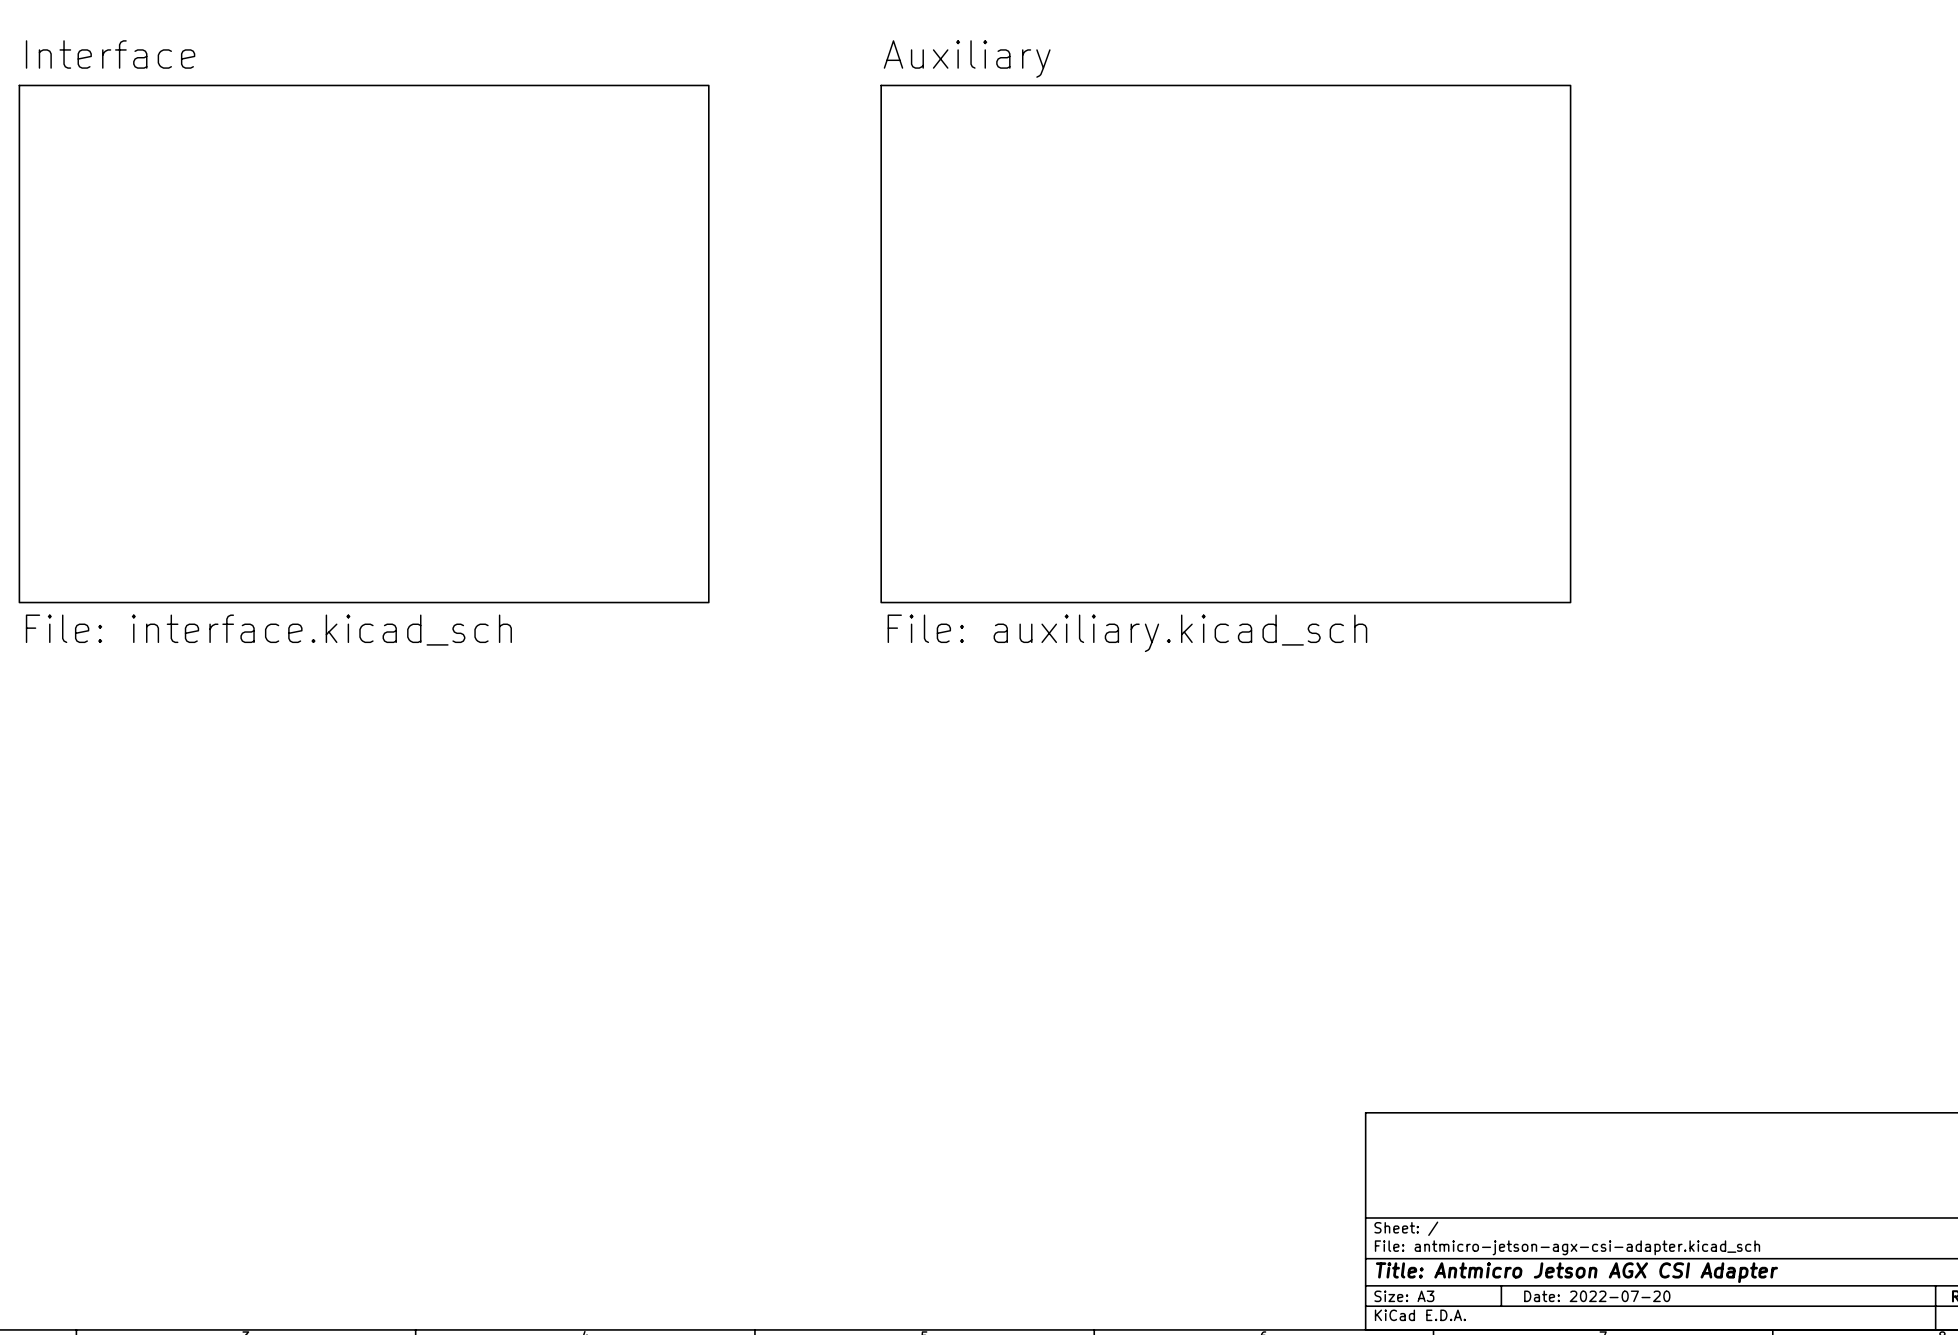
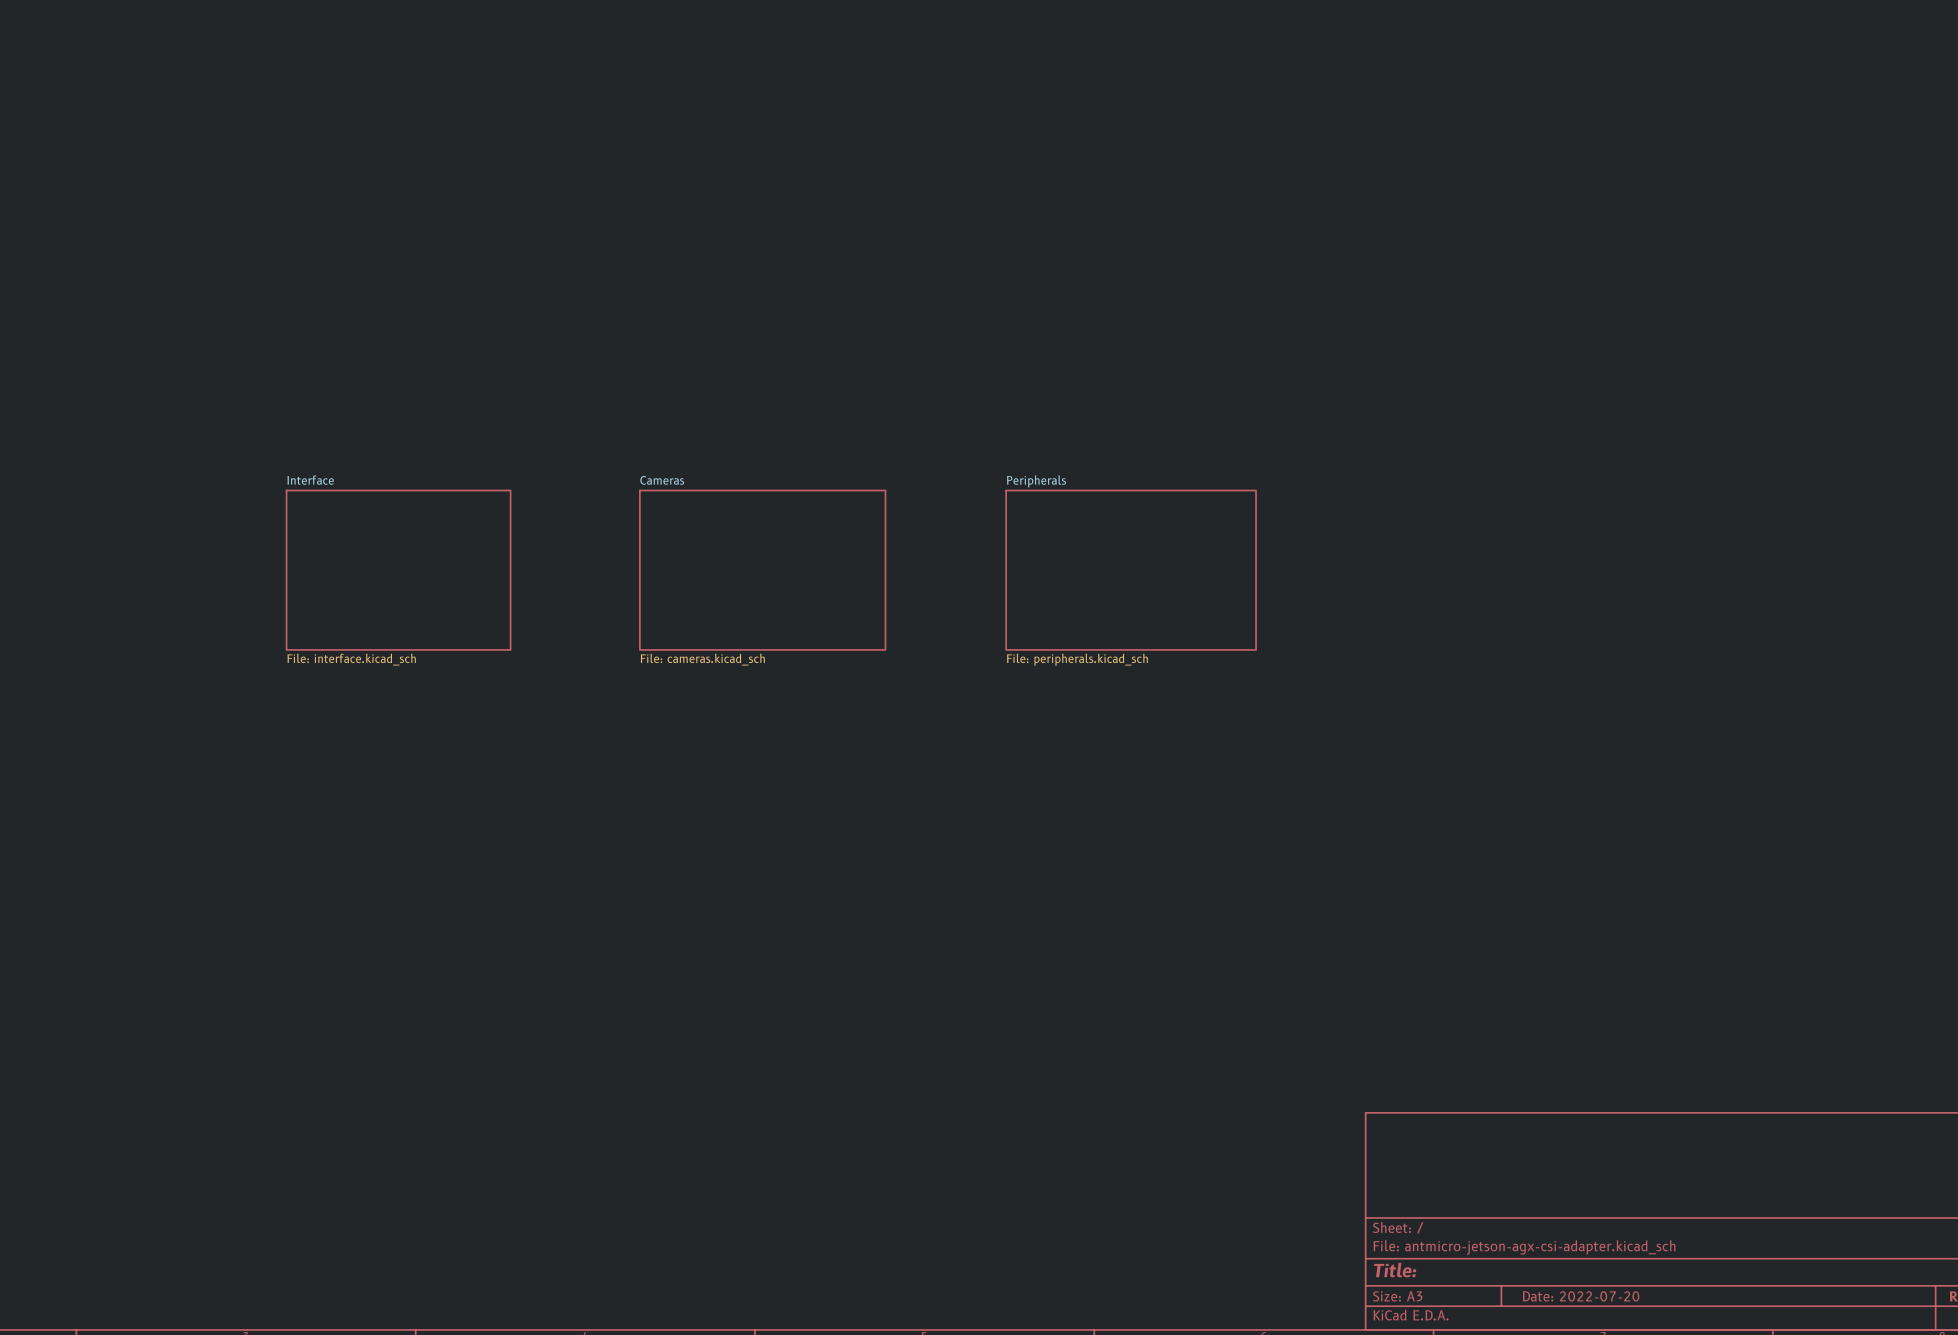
sheet Interface: File: interface.kicad_sch (364, 344) -> none
sheet Auxiliary: File: auxiliary.kicad_sch (1225, 344) -> none
sheet Interface: none -> File: interface.kicad_sch (398, 570)
sheet Cameras: none -> File: cameras.kicad_sch (762, 570)
sheet Peripherals: none -> File: peripherals.kicad_sch (1131, 570)
title block: Title: Antmicro Jetson AGX CSI Adapter (1576, 1272) -> Title: (1395, 1270)

